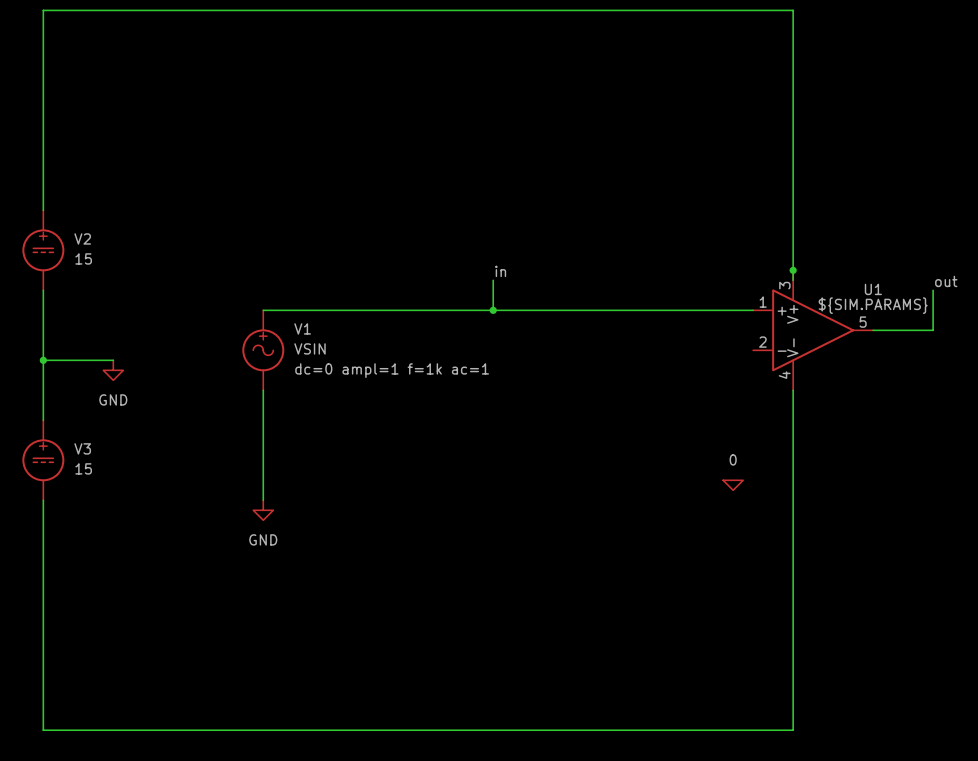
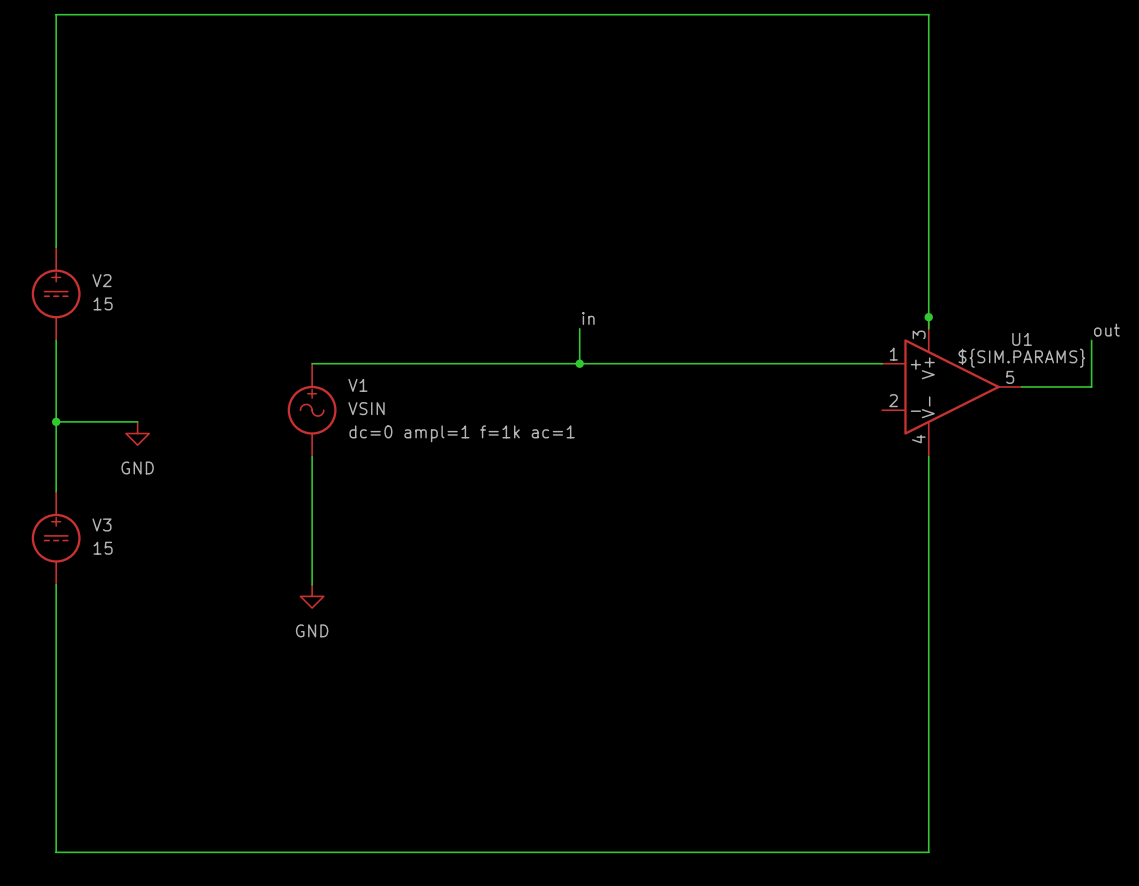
power symbol: 0 (733, 485) -> none

